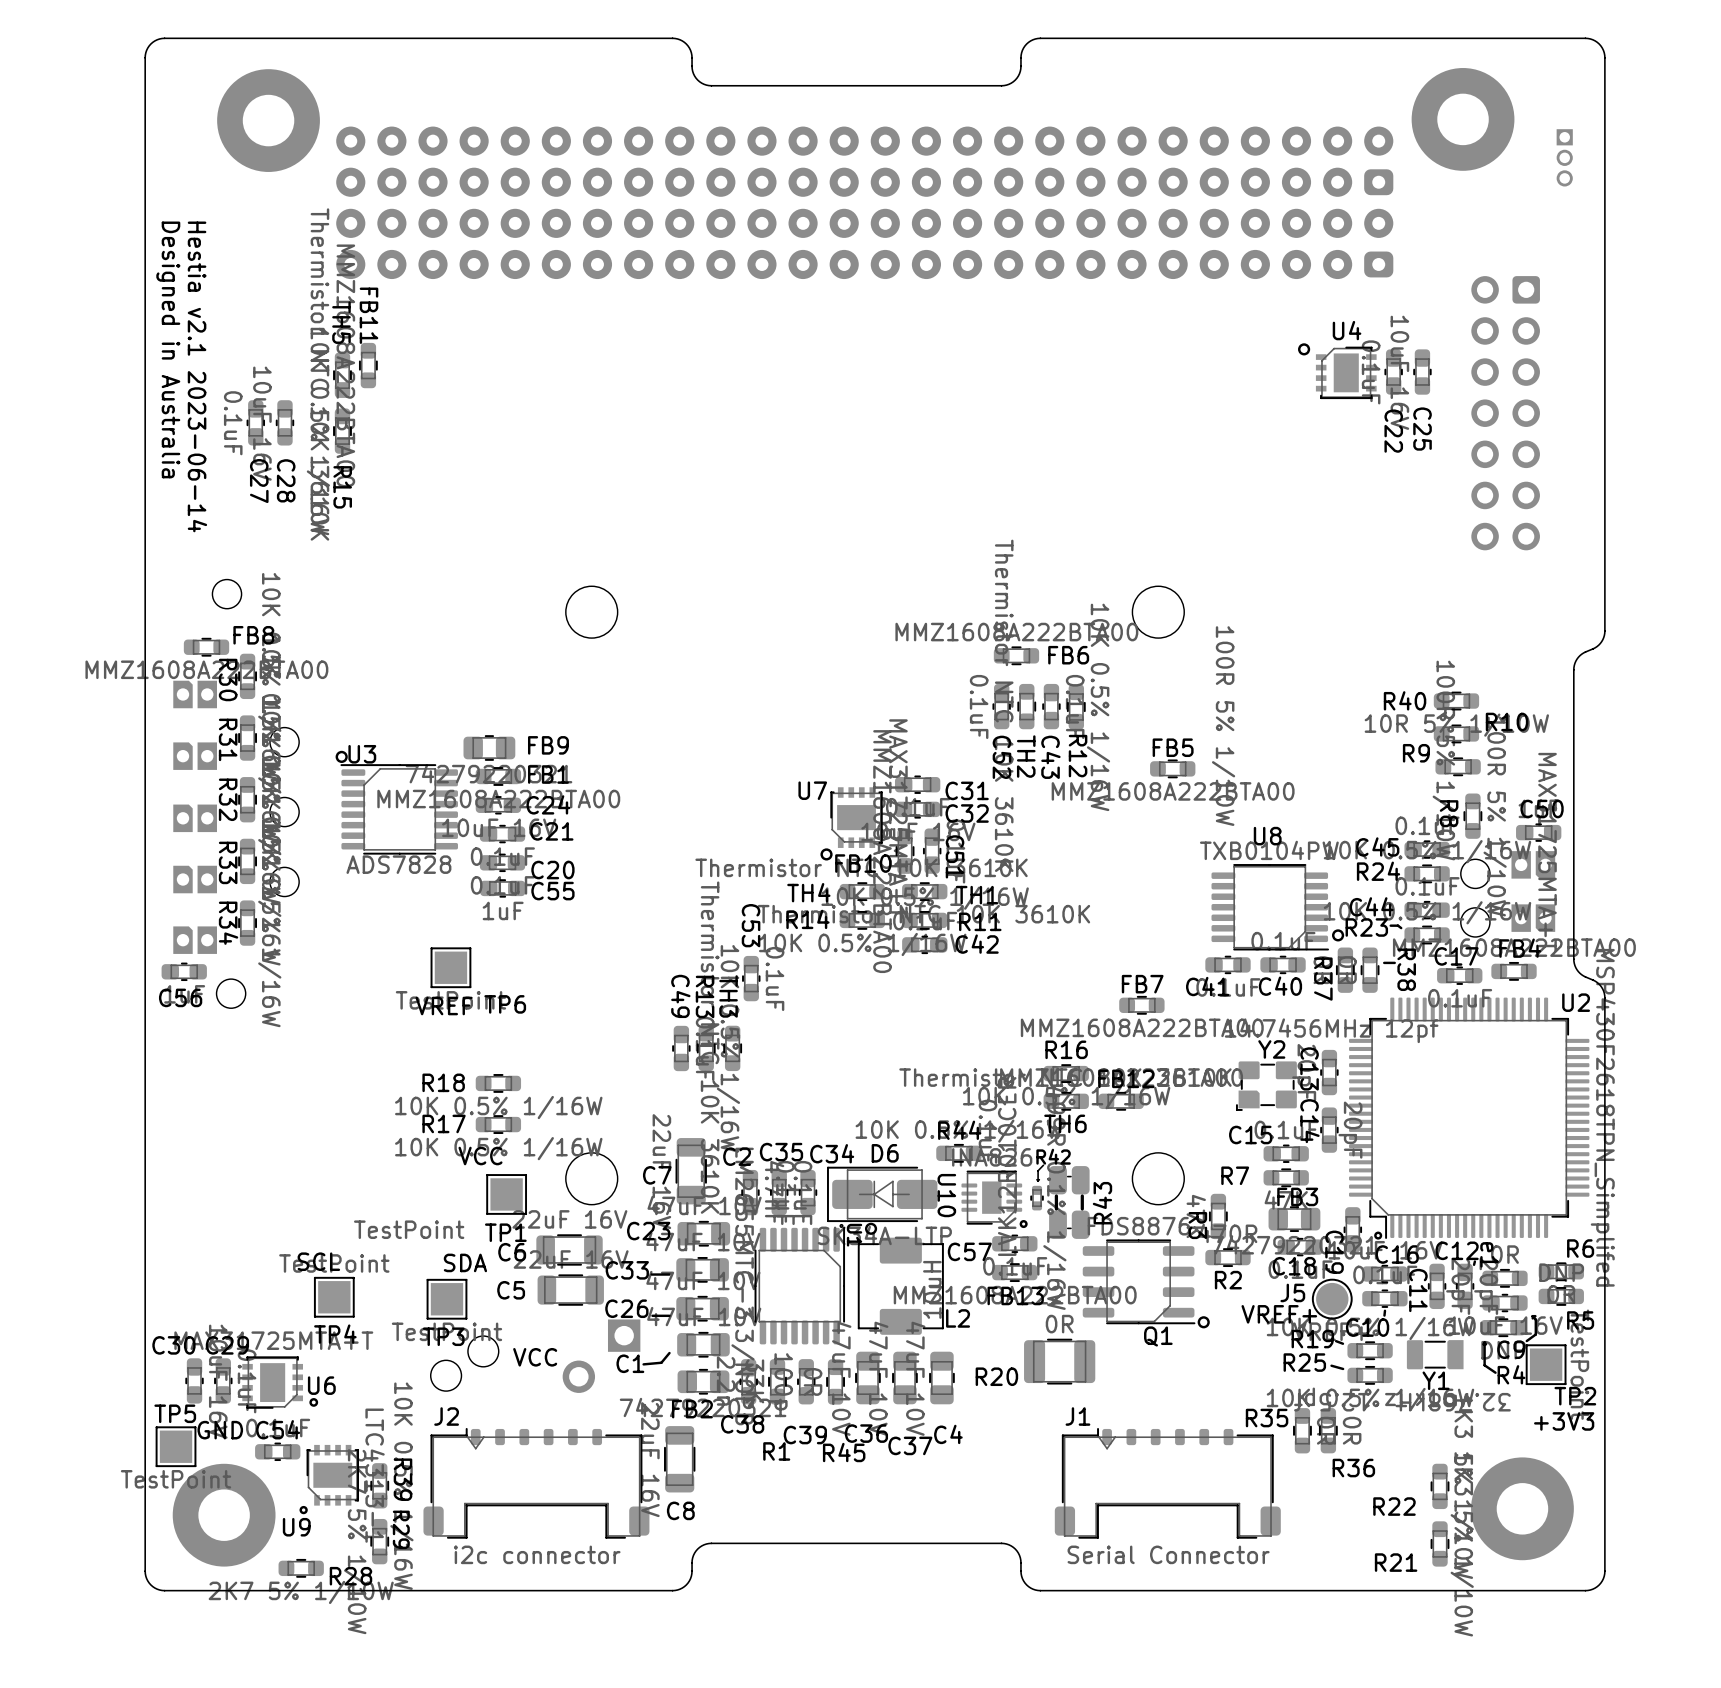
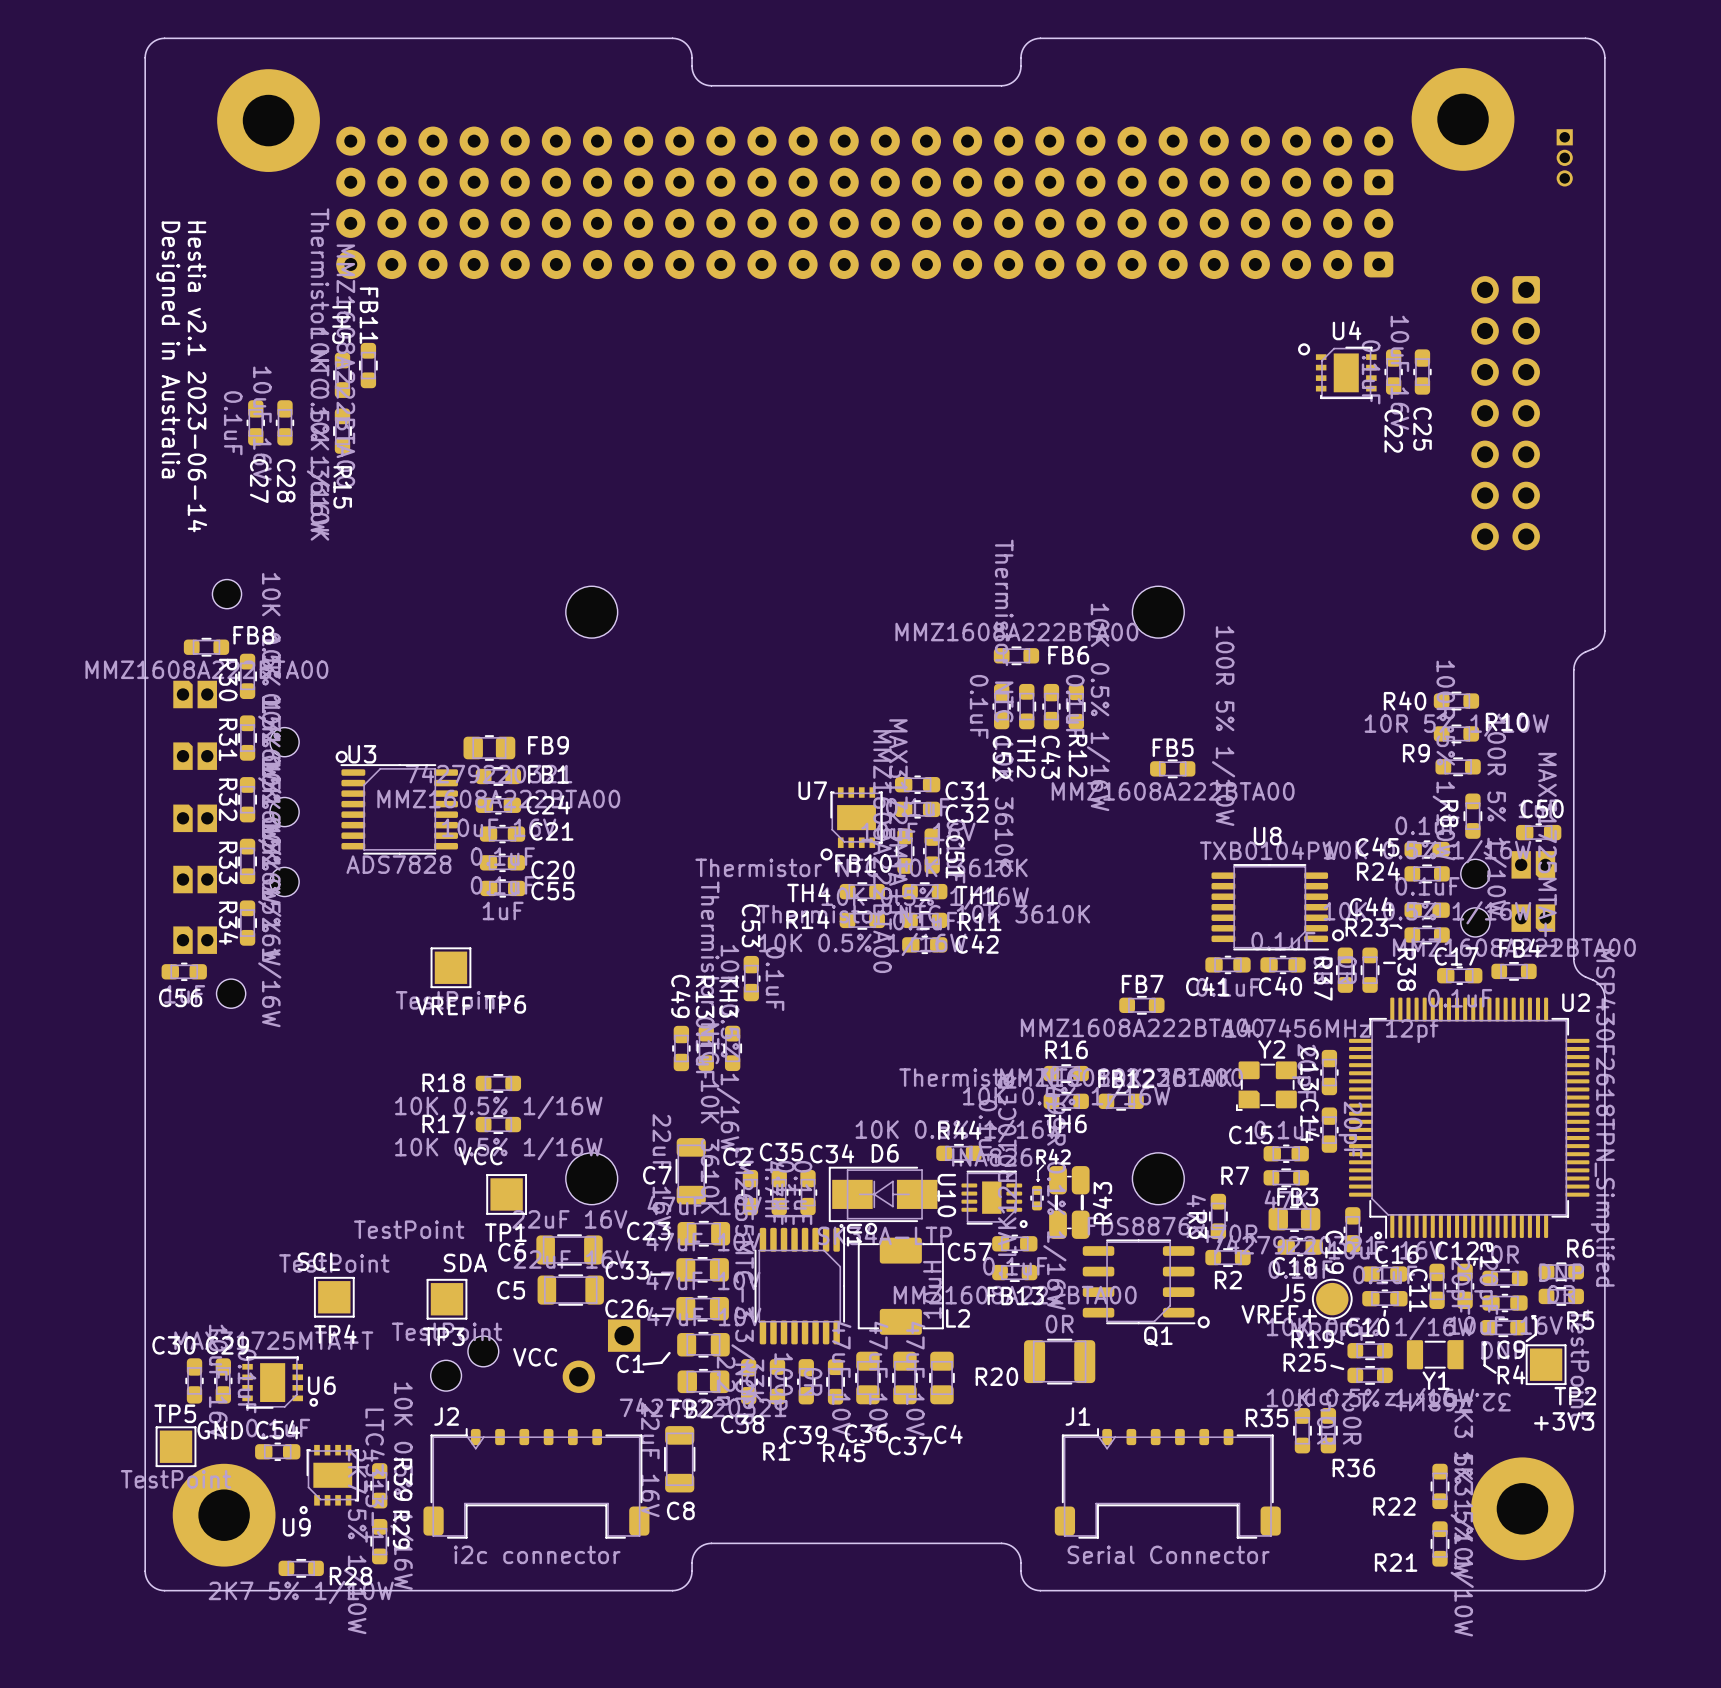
D6 footprint: [827, 1166, 938, 1223] -> [828, 1166, 938, 1223]

